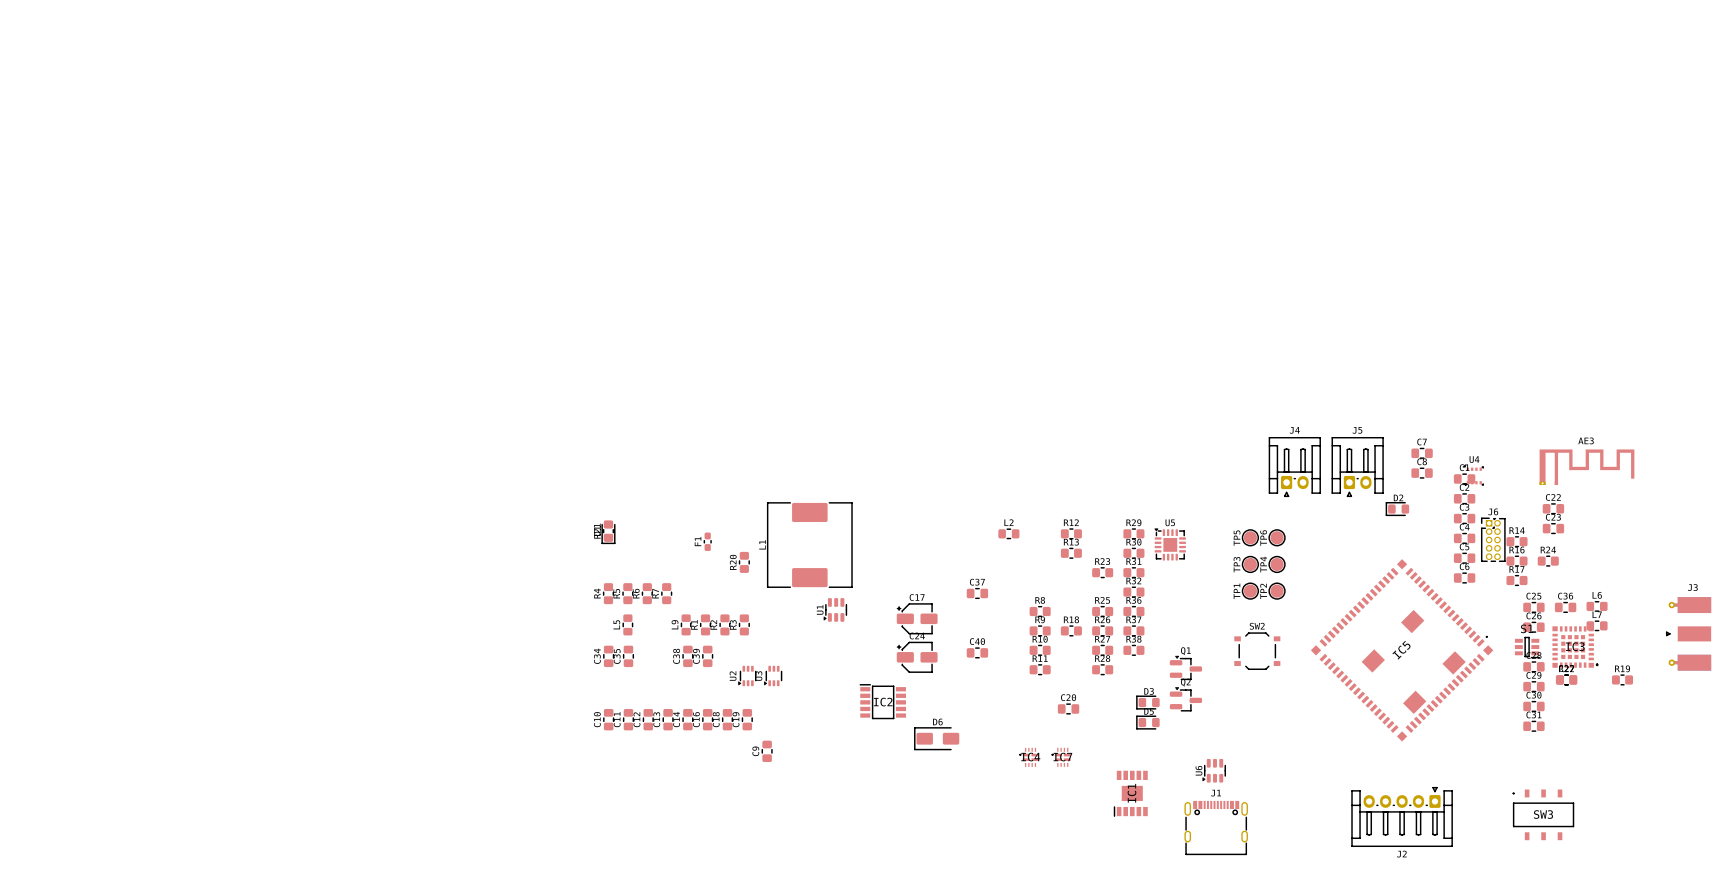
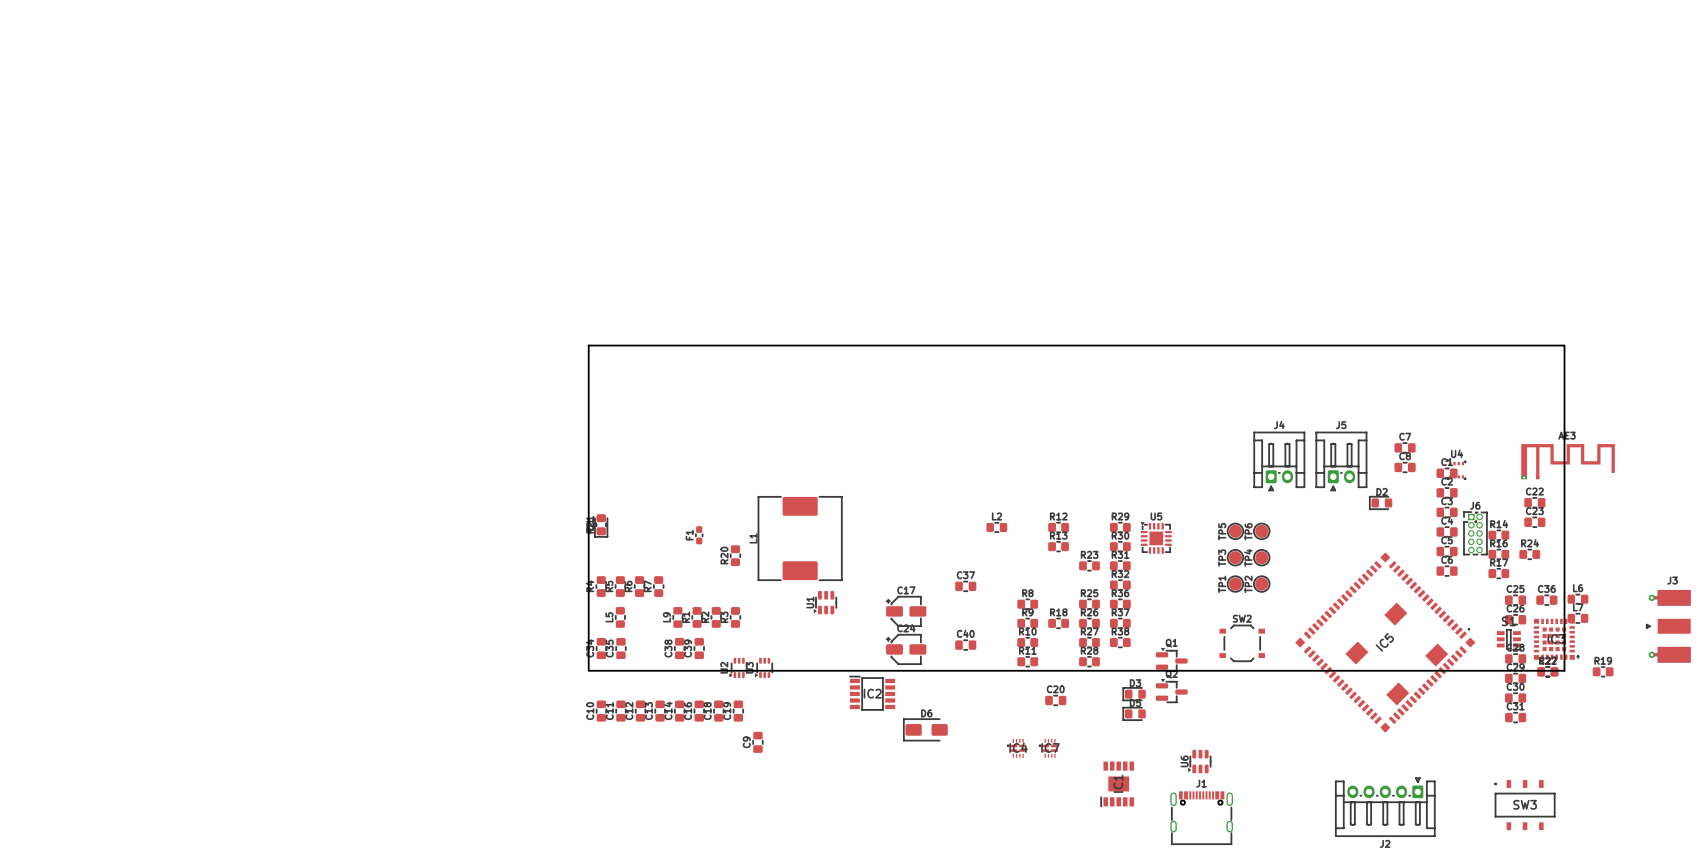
board edge: none -> (1563, 345) (588, 345) (588, 670)
board edge: none -> (1564, 345) (1564, 670)
board edge: none -> (589, 670) (1564, 670)

